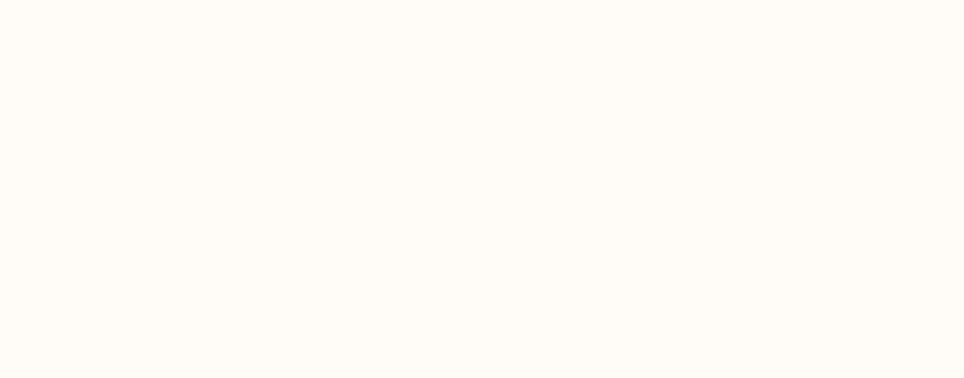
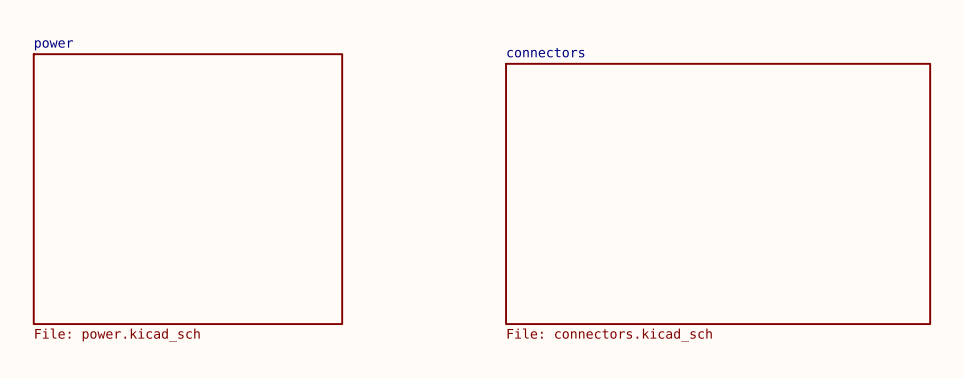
sheet power: none -> File: power.kicad_sch (187, 189)
sheet connectors: none -> File: connectors.kicad_sch (718, 193)

